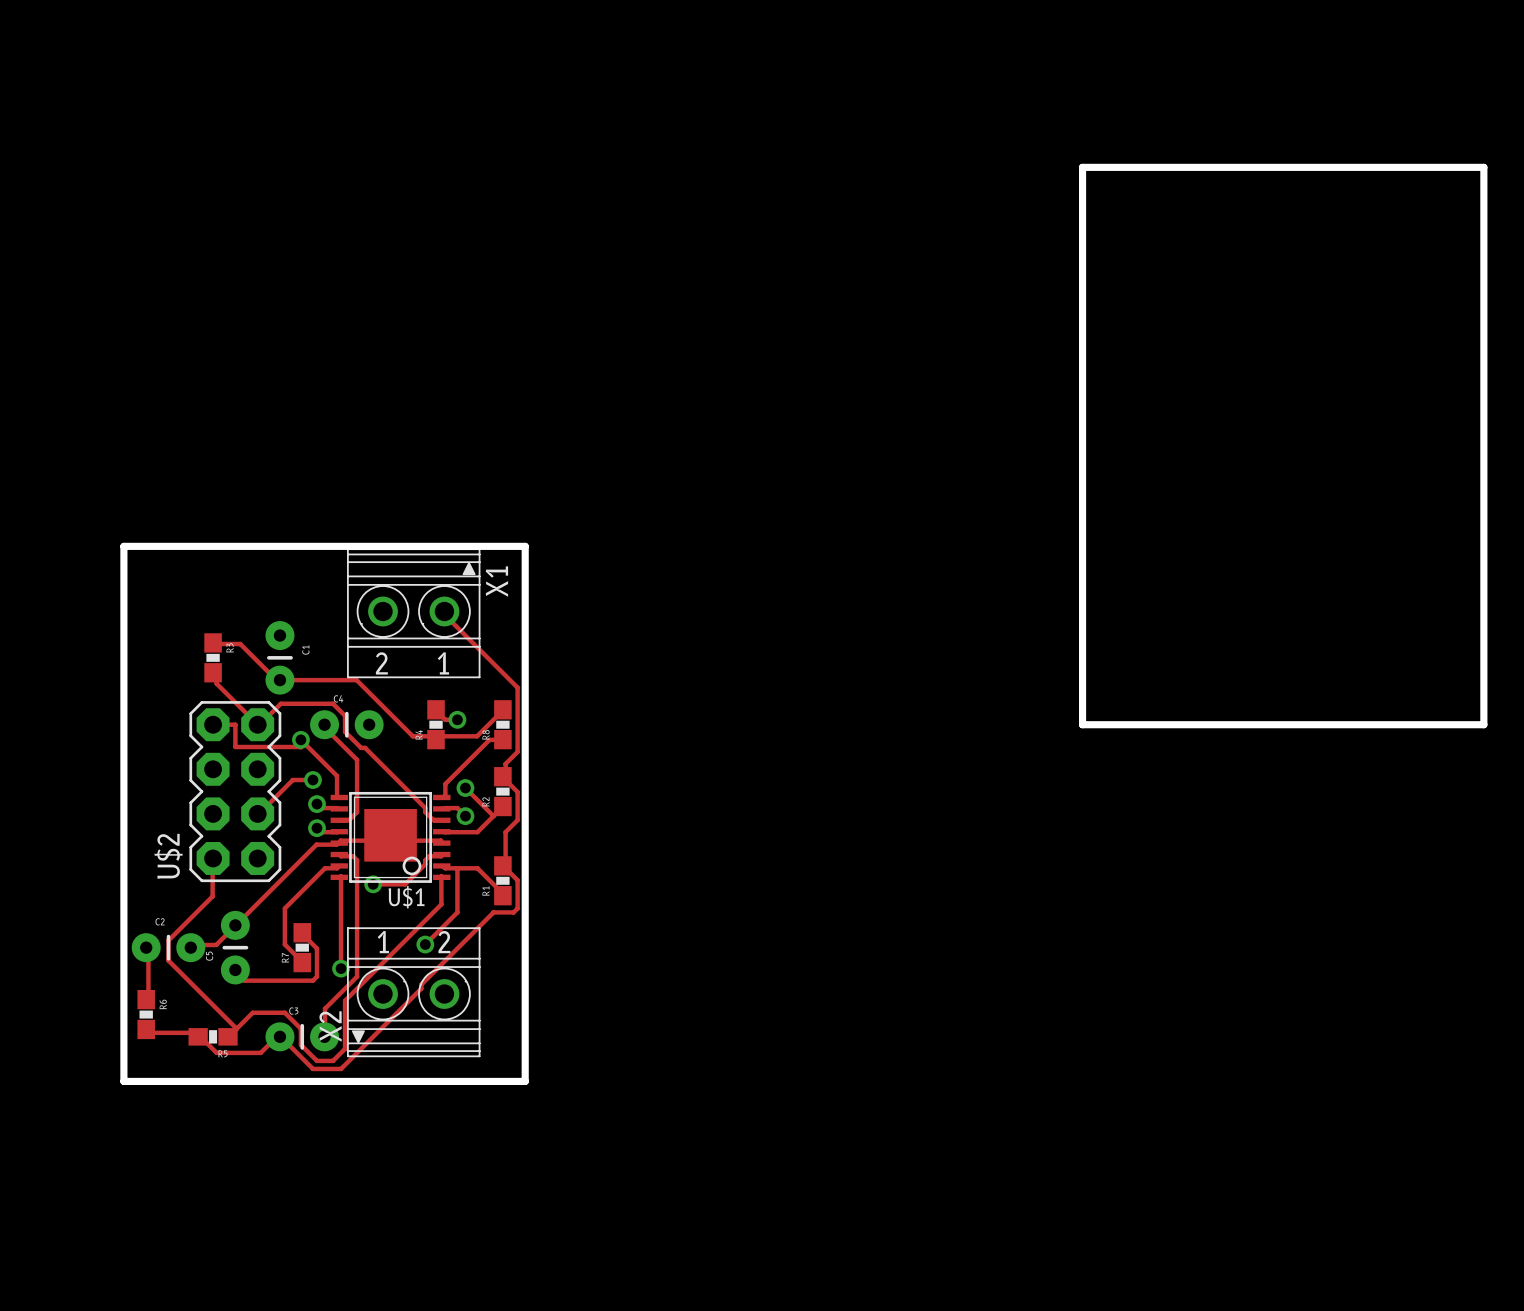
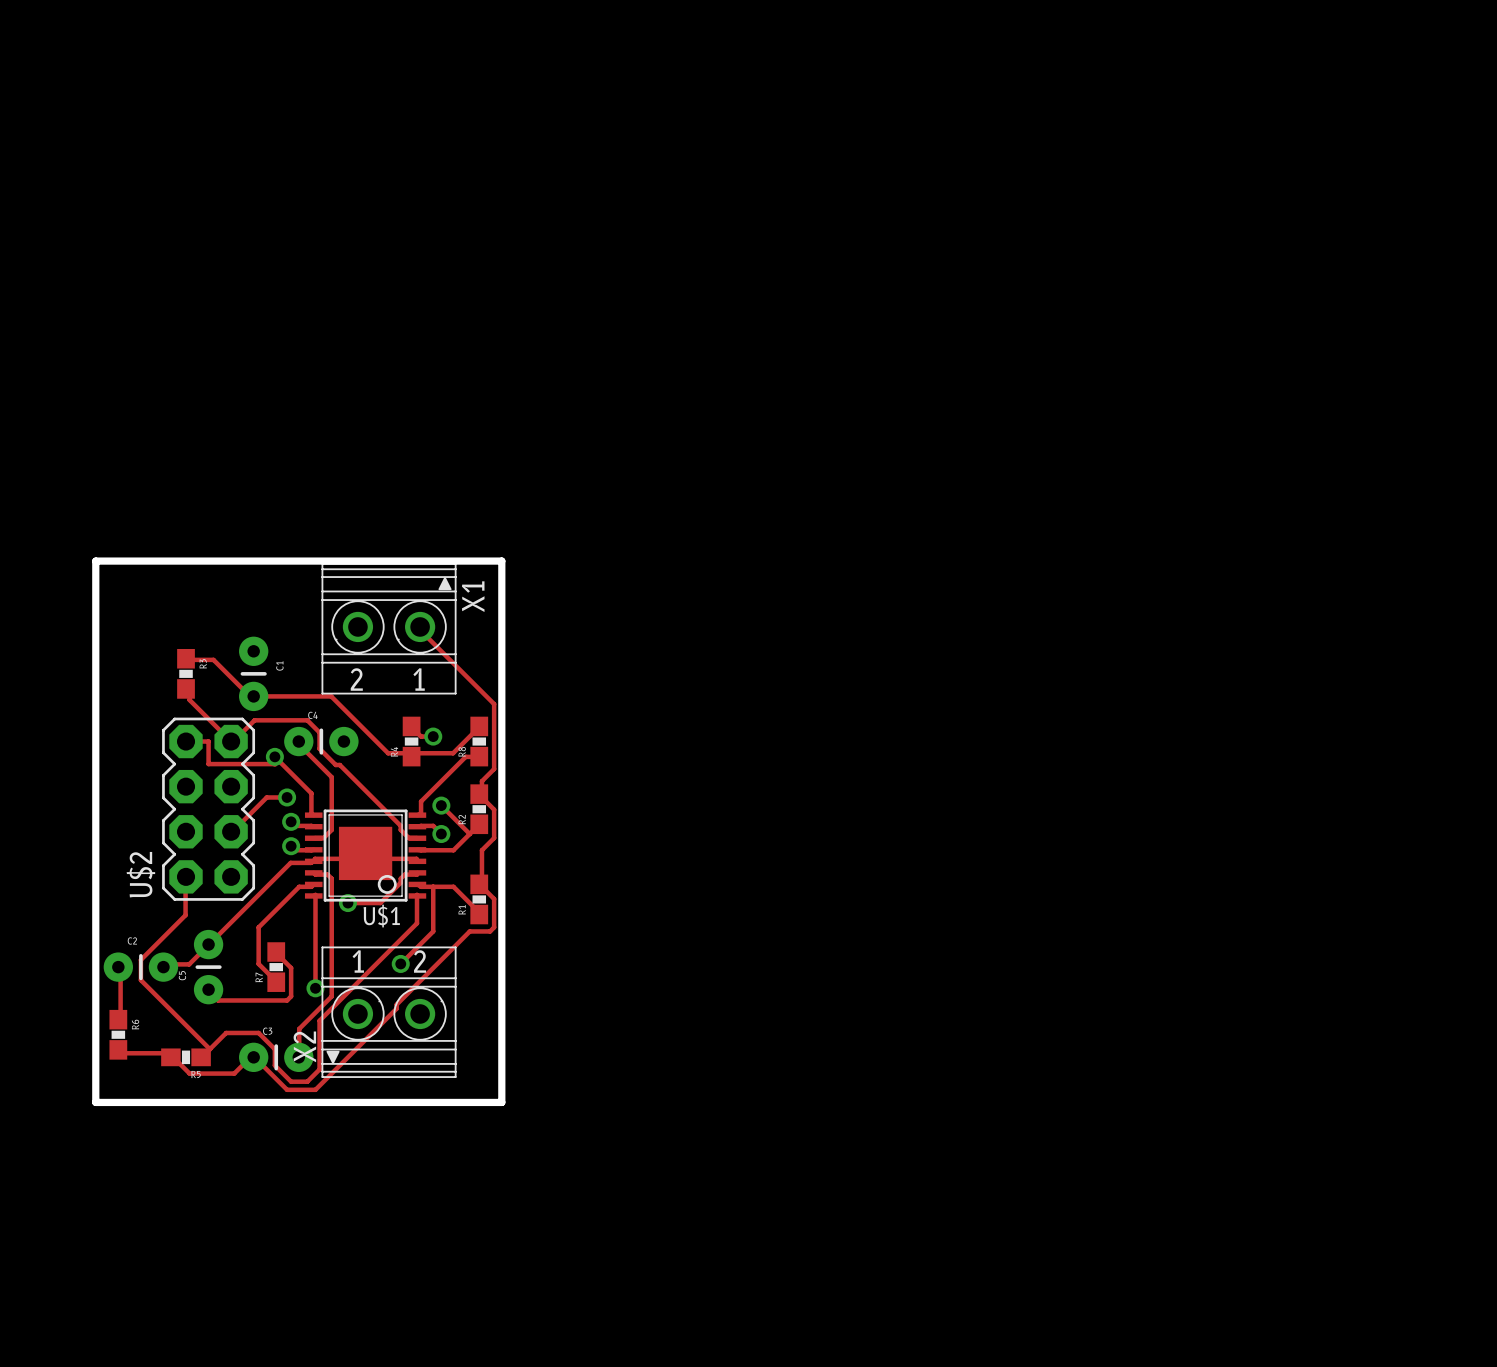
board edge: (1082, 167) (1082, 724) (1483, 724) (1483, 167) (1082, 167) -> none

